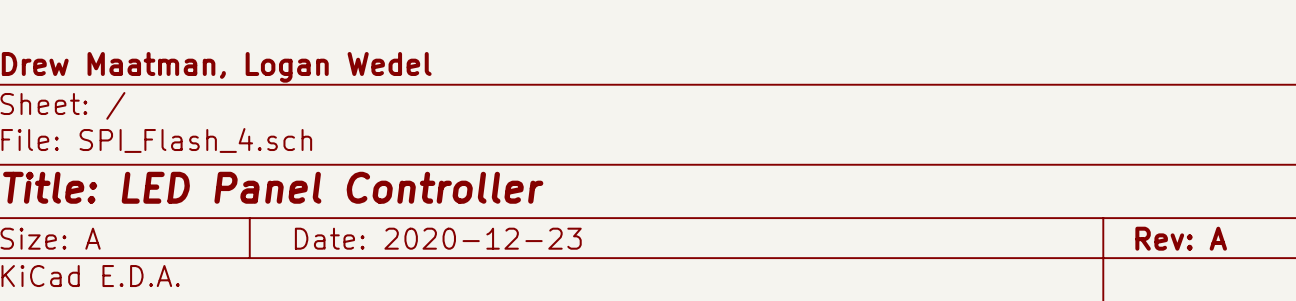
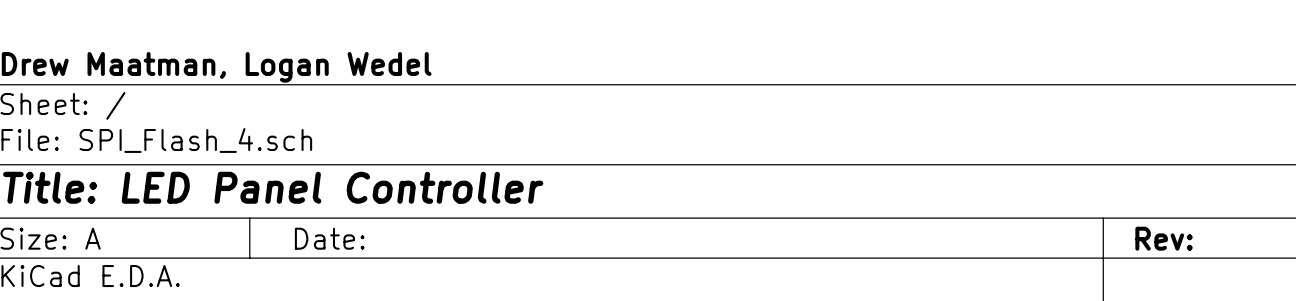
title block: Date: 2020-12-23 (438, 238) -> Date: (329, 238)
title block: Rev: A (1181, 238) -> Rev: (1164, 238)

